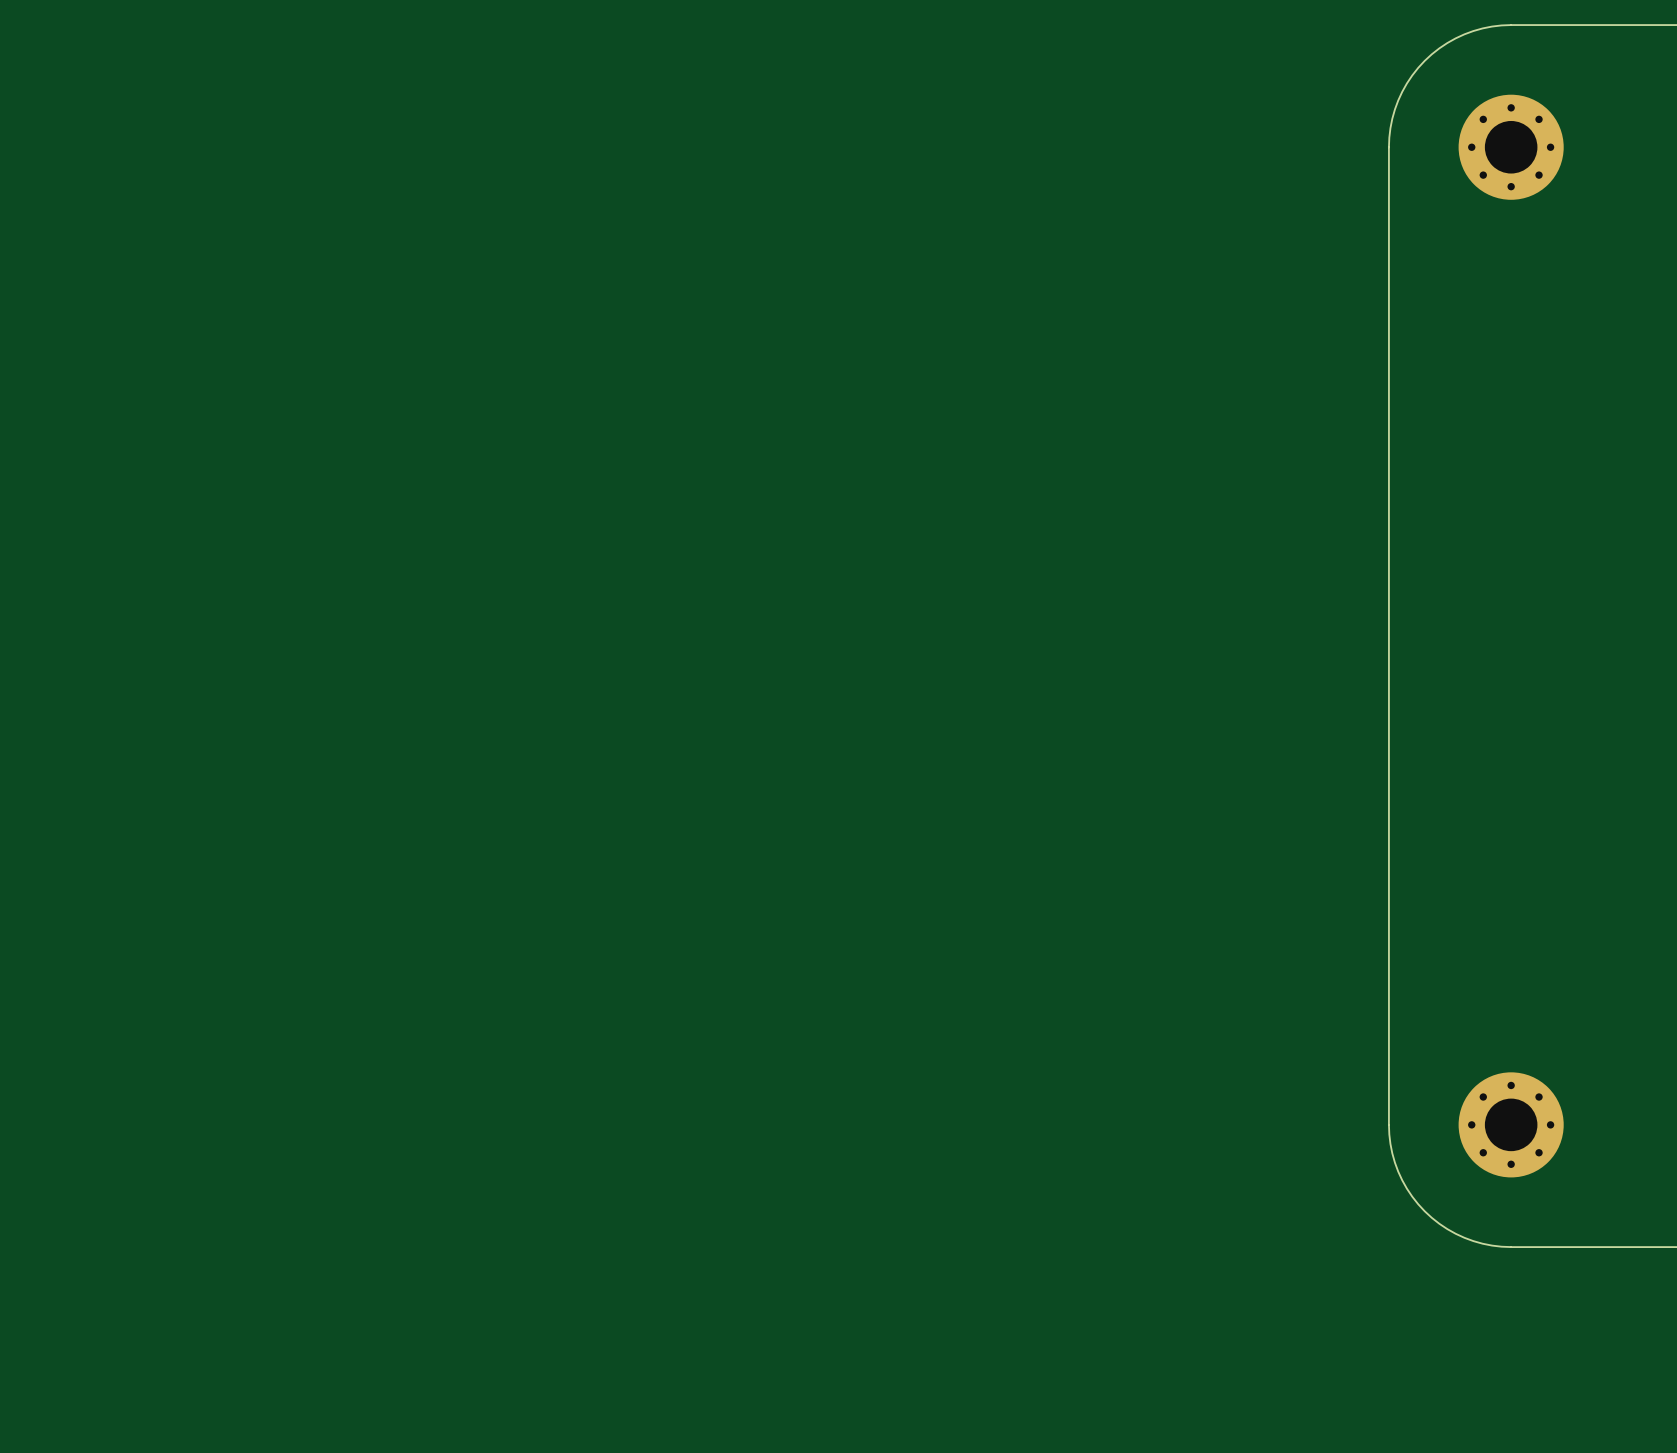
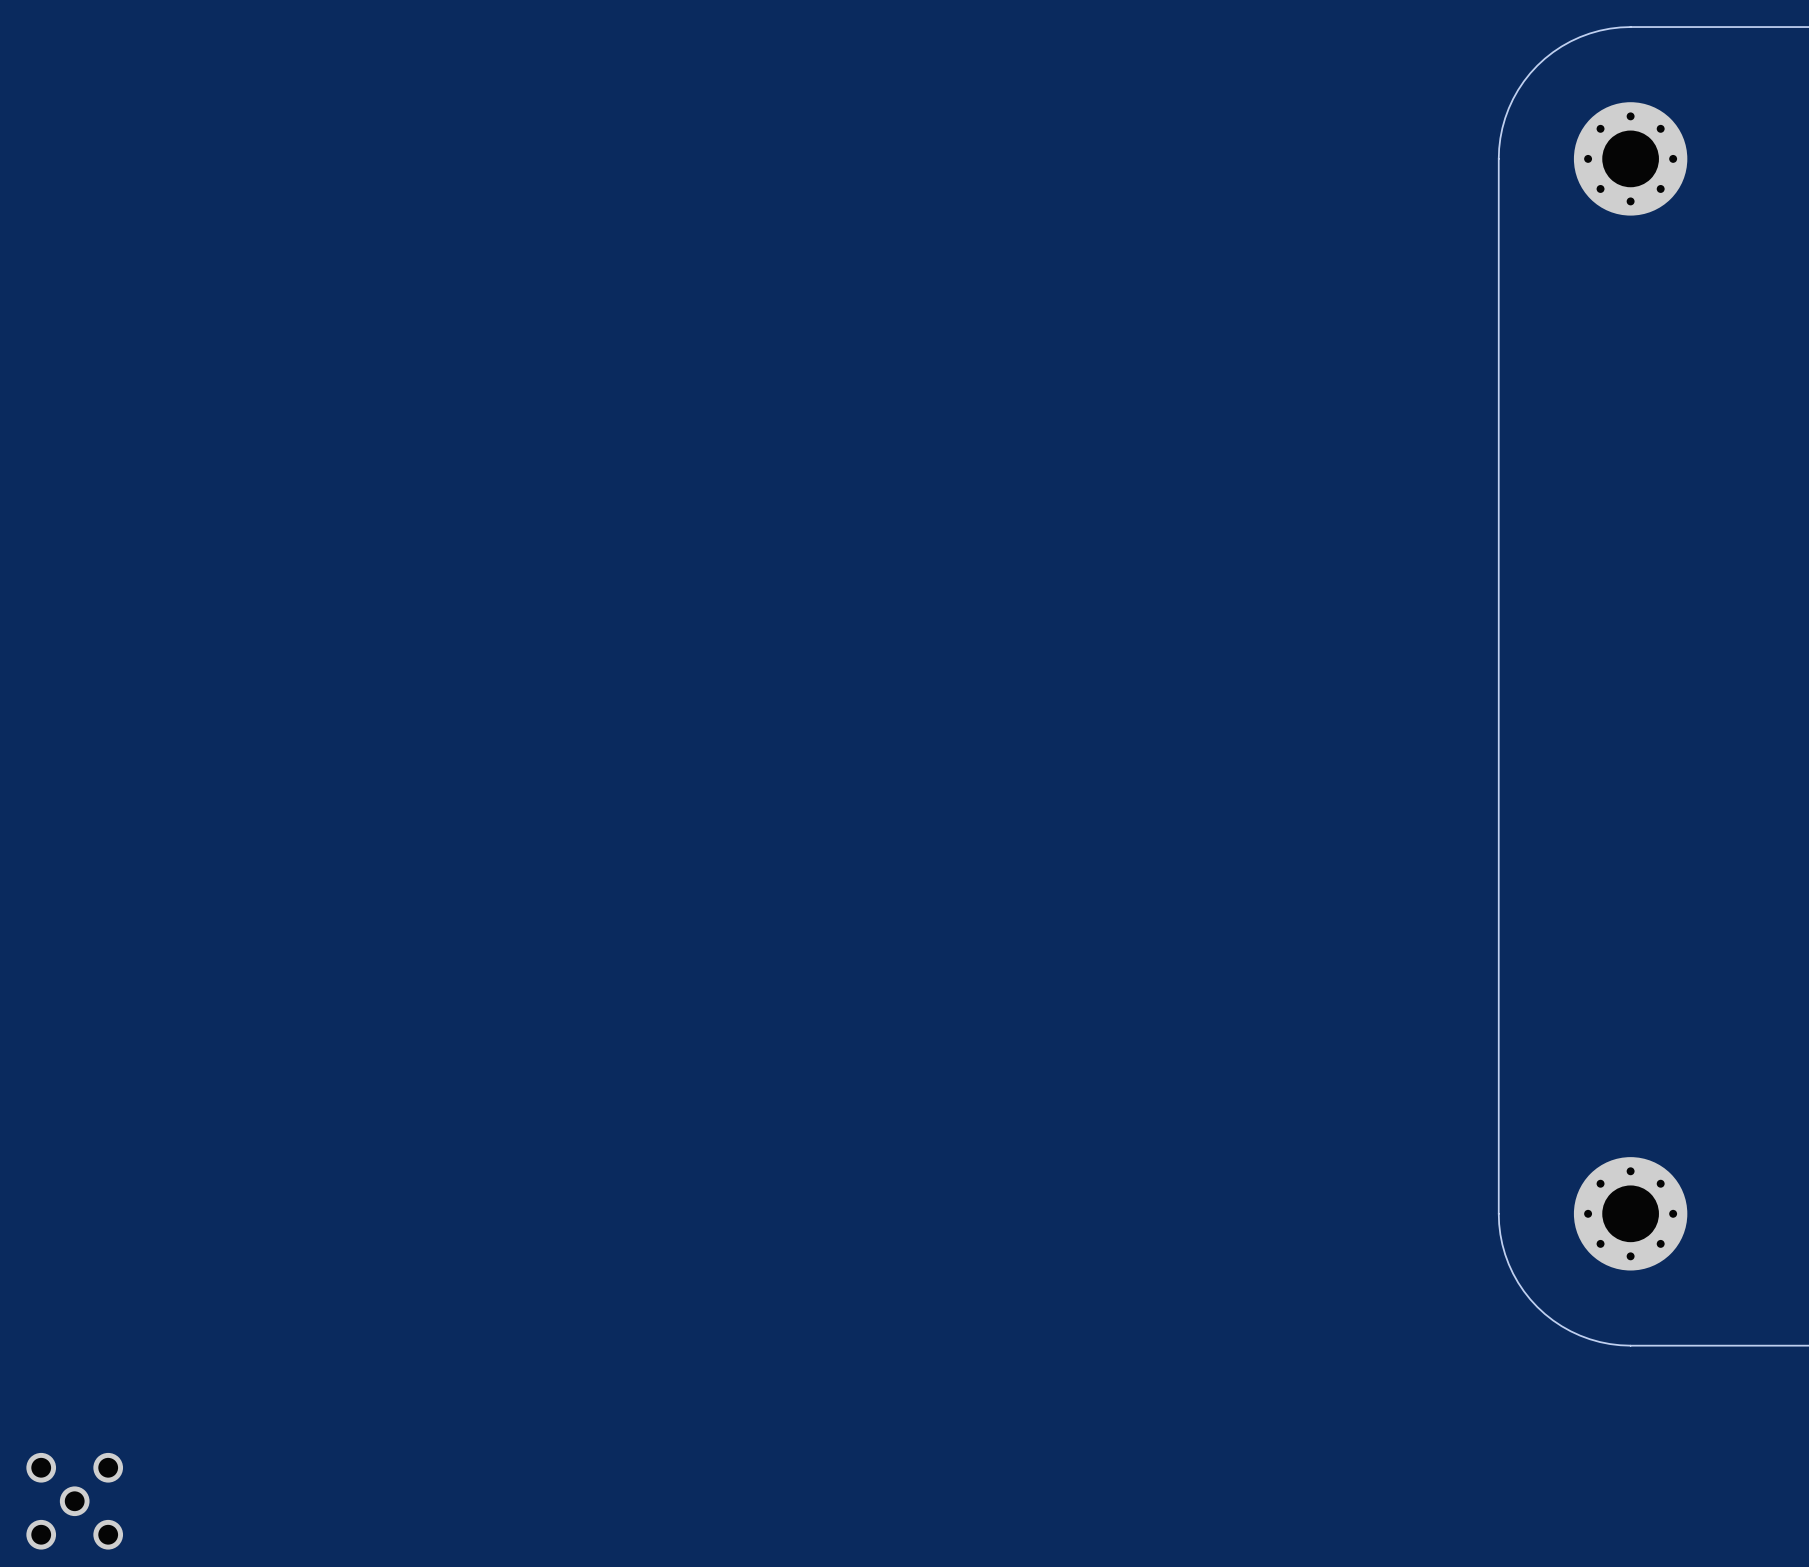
part: none -> (74, 1501)

